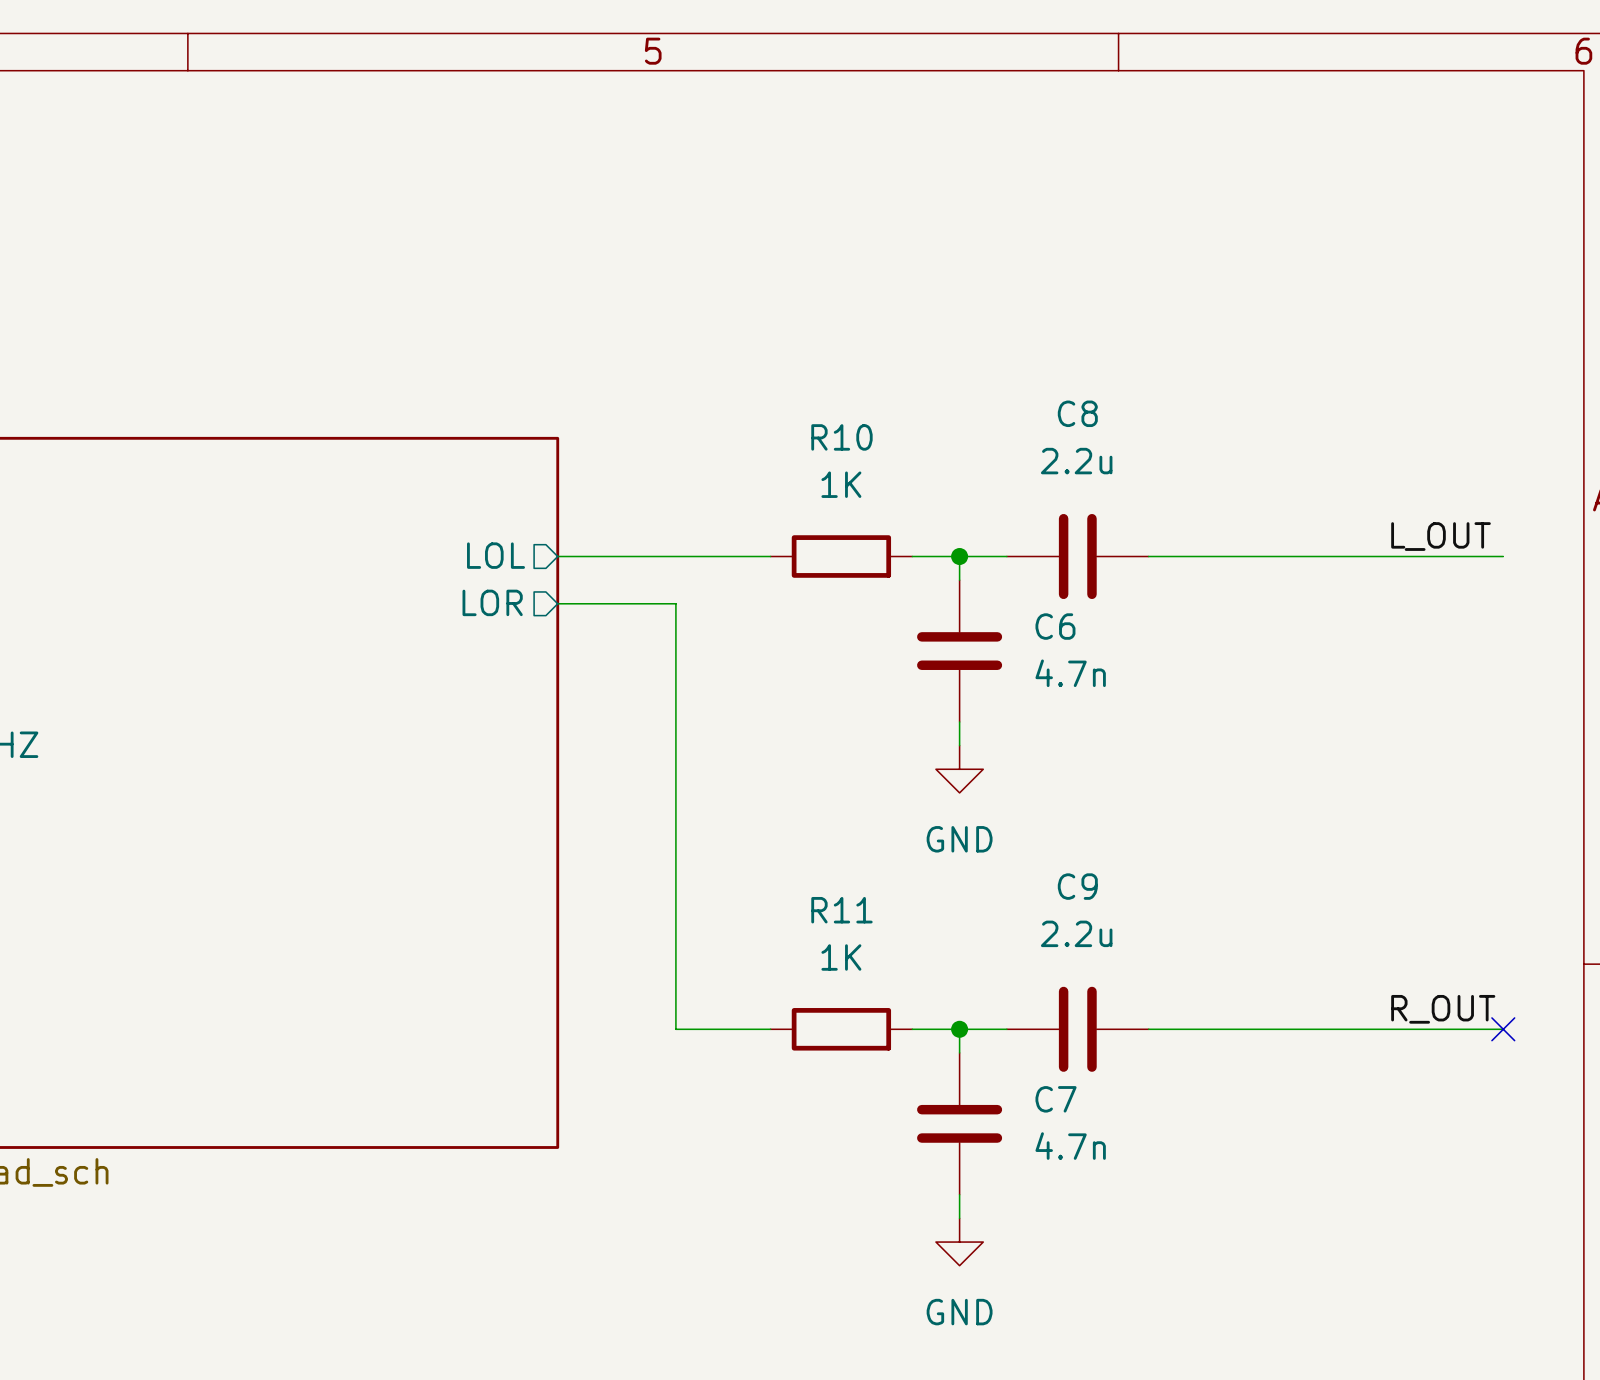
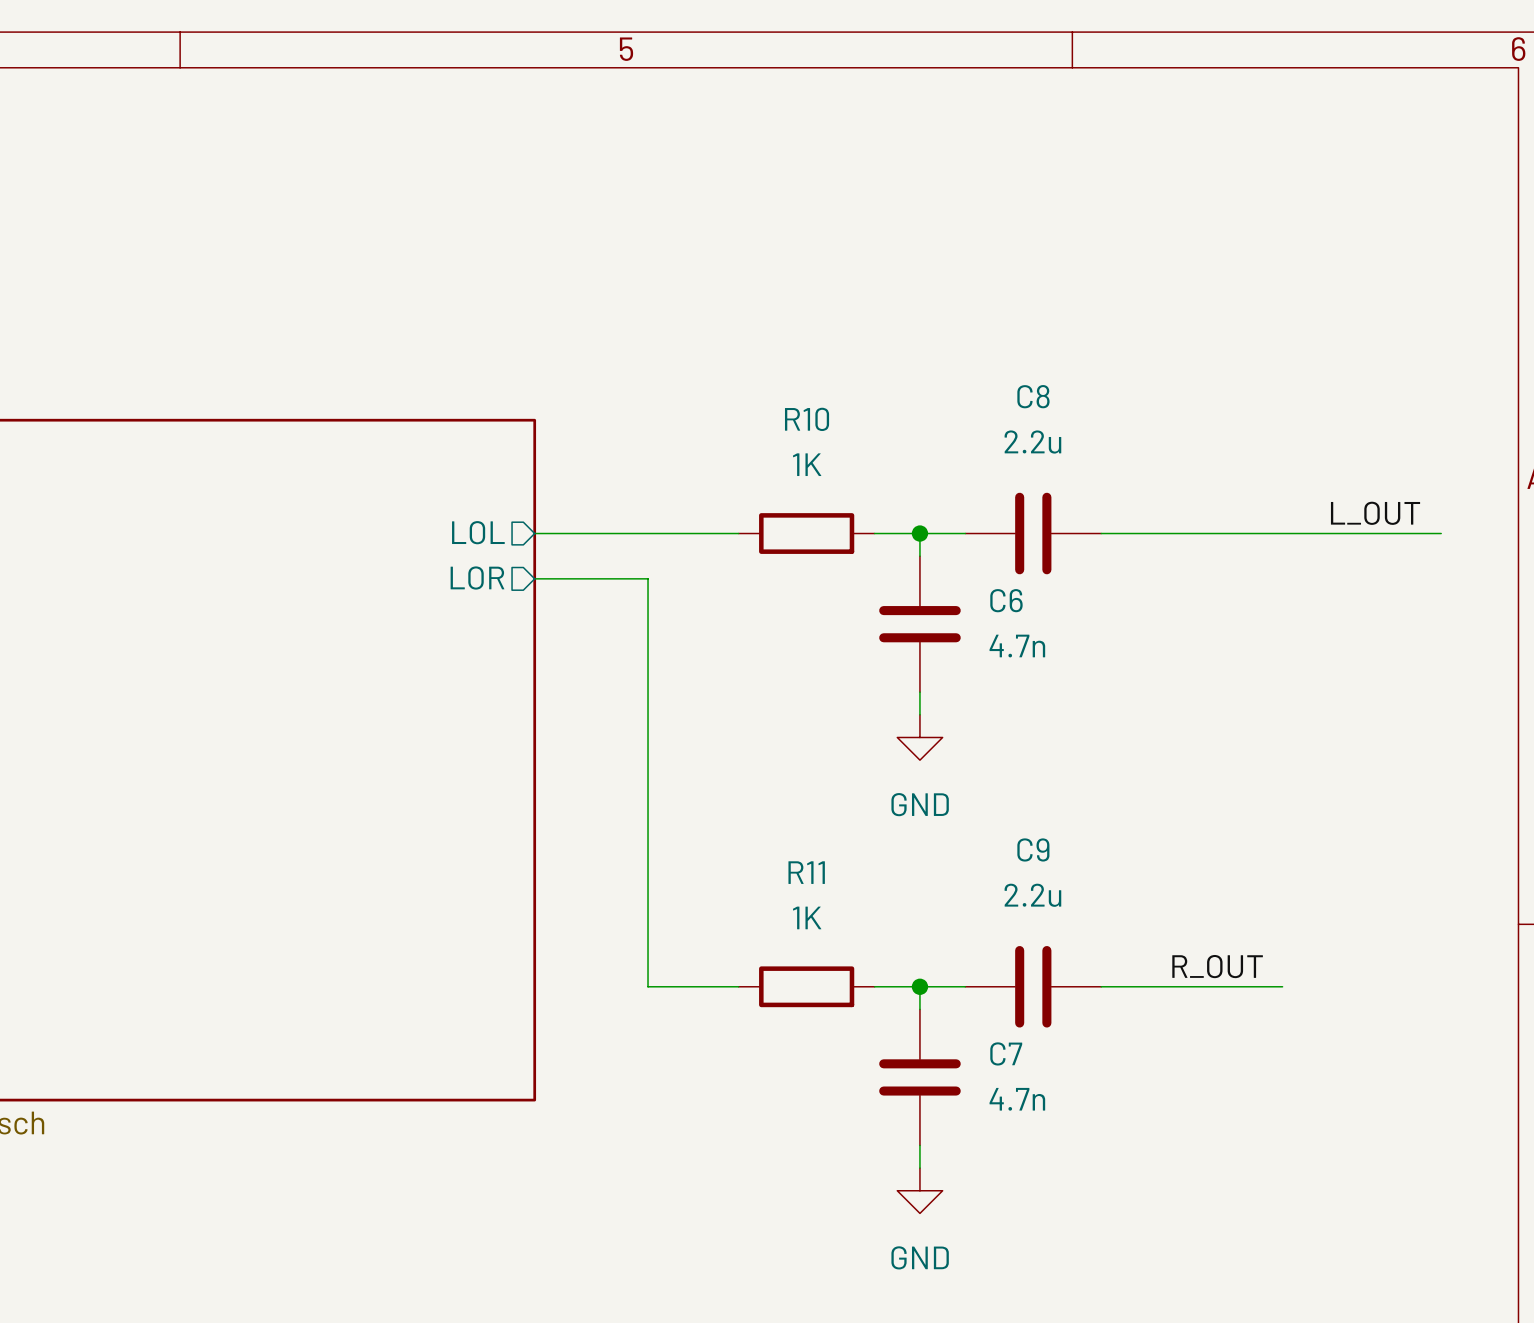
label position: R_OUT (1443, 1009) -> R_OUT (1217, 966)
wire: (1337, 1029) (1503, 1029) -> none
no-connect mark: (1503, 1029) -> none

